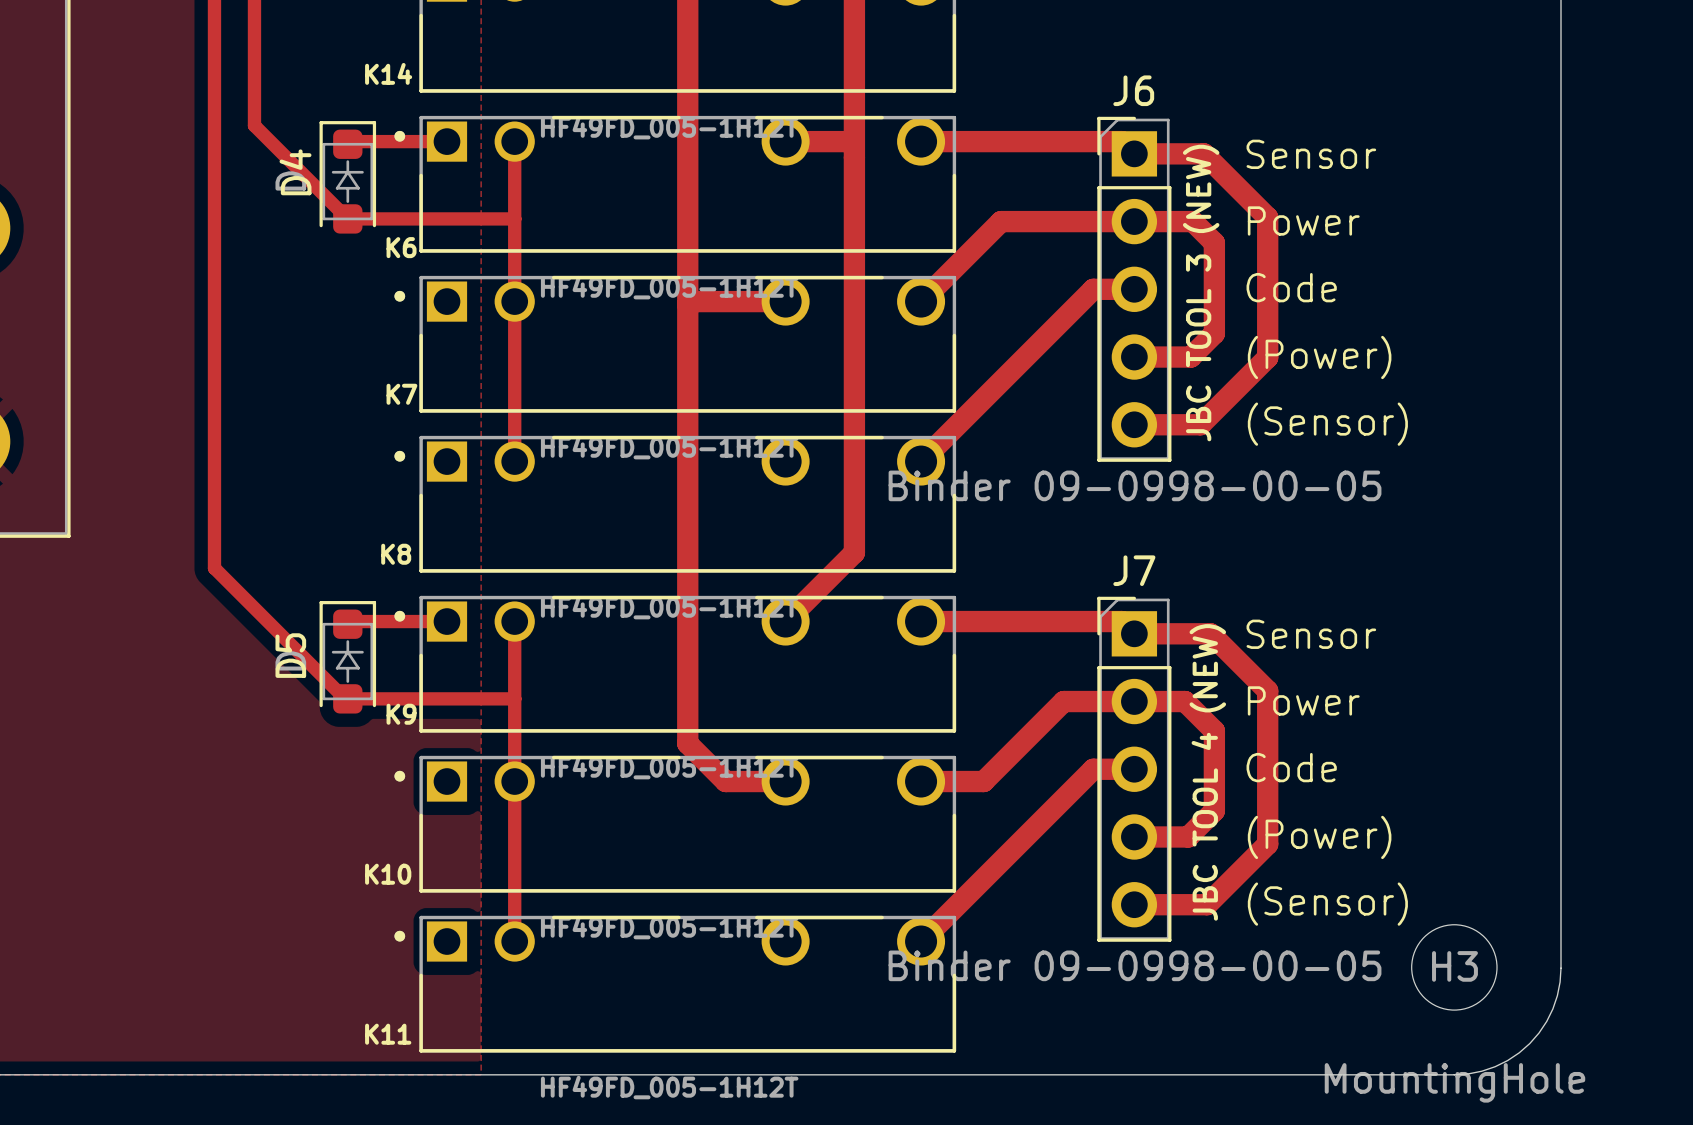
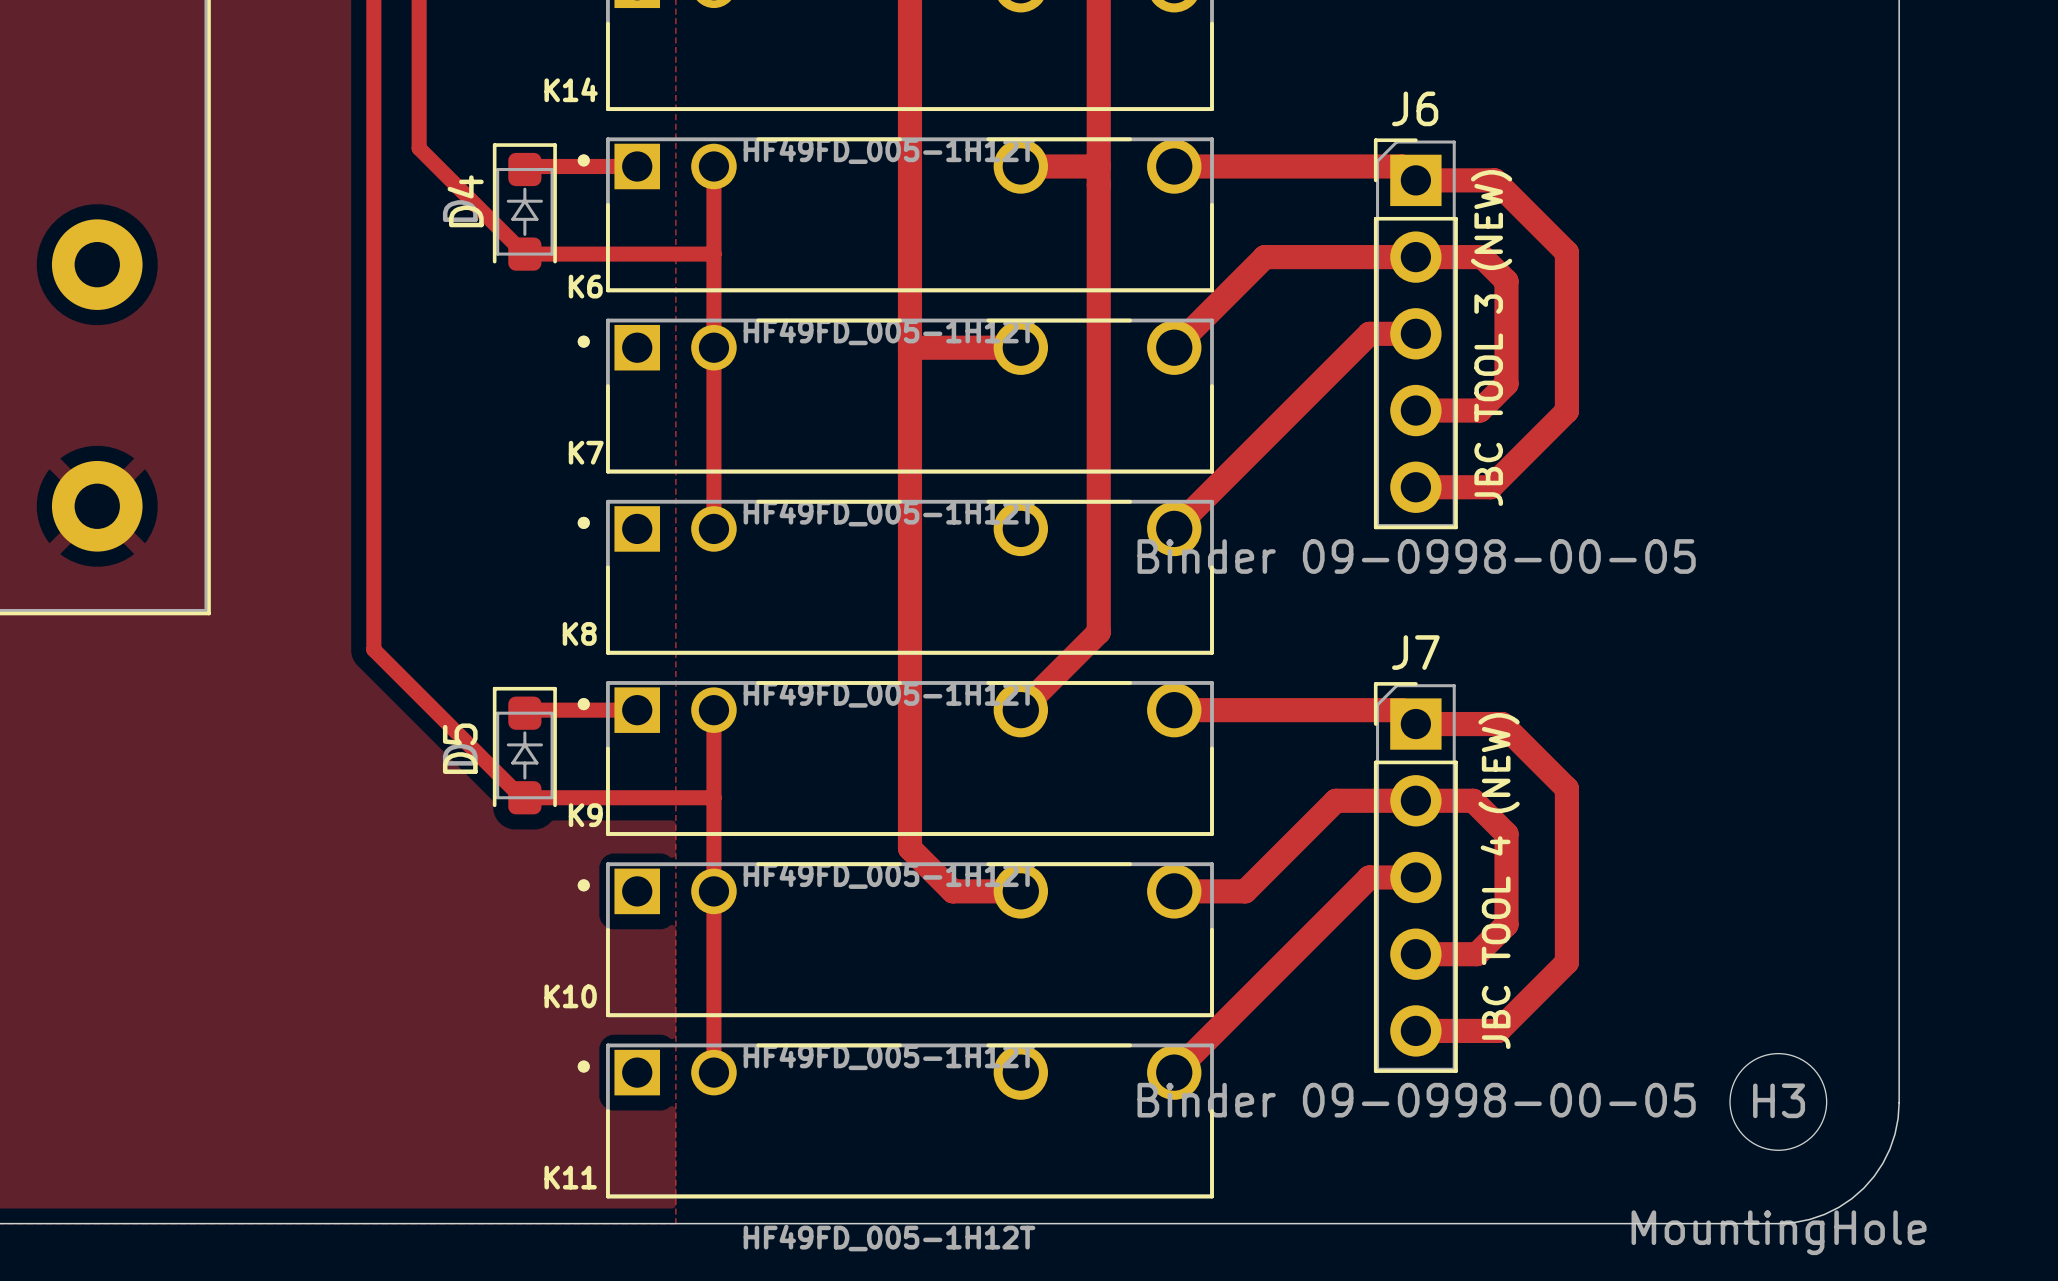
text: Sensor (1311, 154) -> none
text: Power (1303, 220) -> none
text: Code (1291, 287) -> none
text: (Power) (1319, 357) -> none
text: (Sensor) (1327, 424) -> none
text: Sensor (1311, 634) -> none
text: Power (1303, 700) -> none
text: Code (1291, 767) -> none
text: (Power) (1319, 837) -> none
text: (Sensor) (1327, 904) -> none

